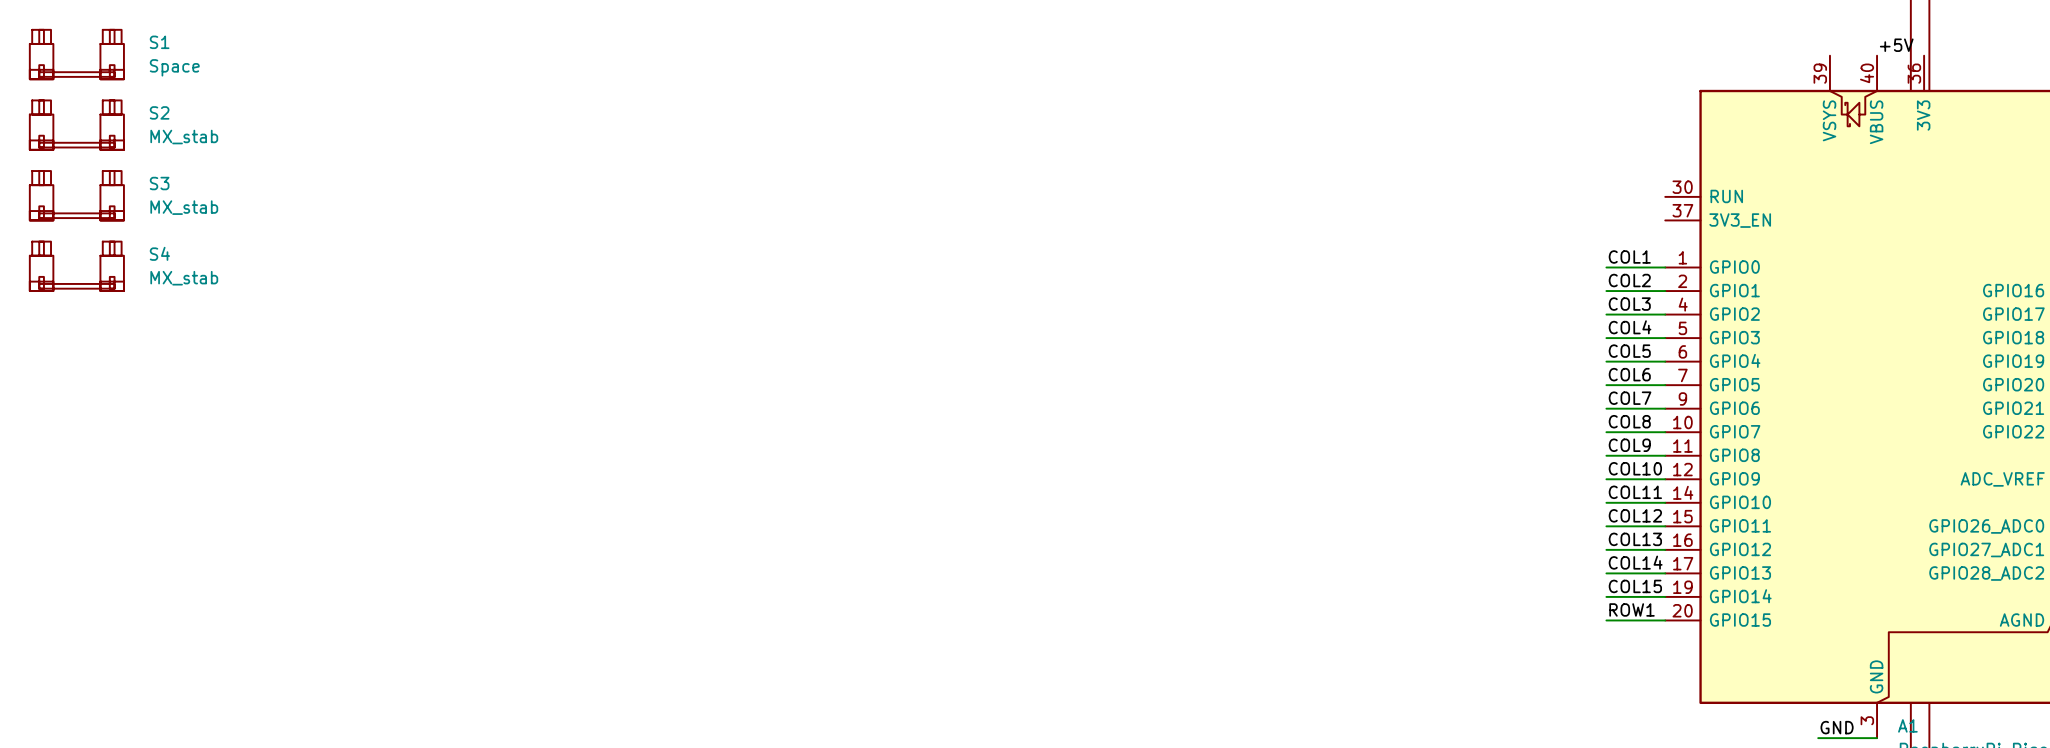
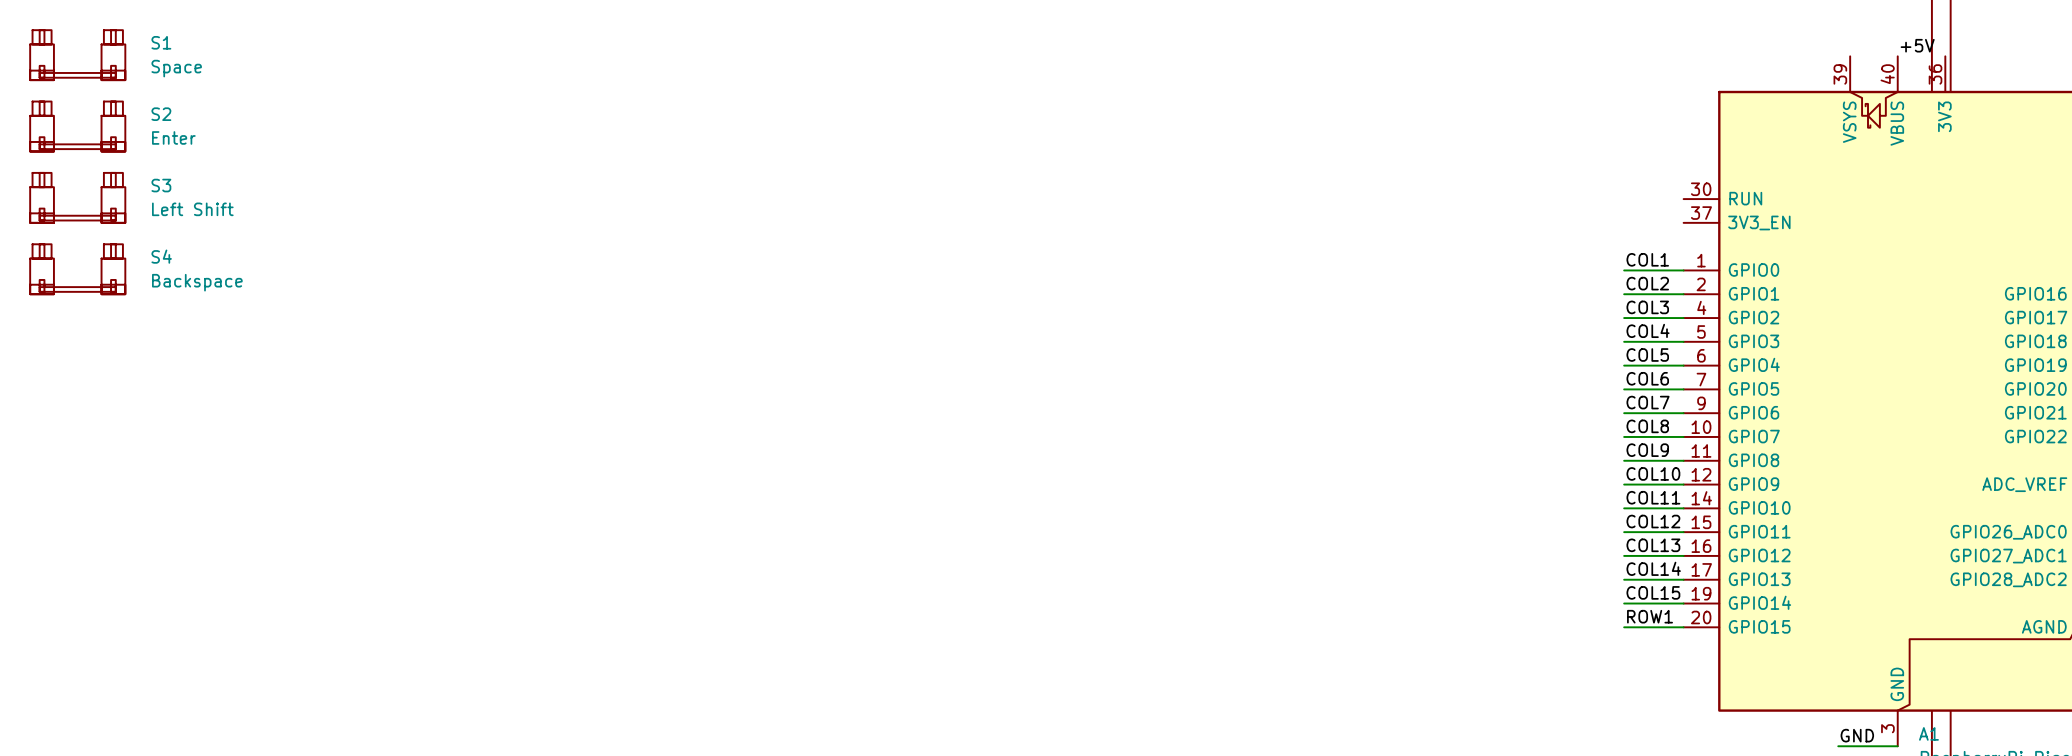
S2 value: MX_stab (184, 137) -> Enter (173, 137)
S3 value: MX_stab (184, 207) -> Left Shift (192, 209)
S4 value: MX_stab (184, 278) -> Backspace (197, 282)

